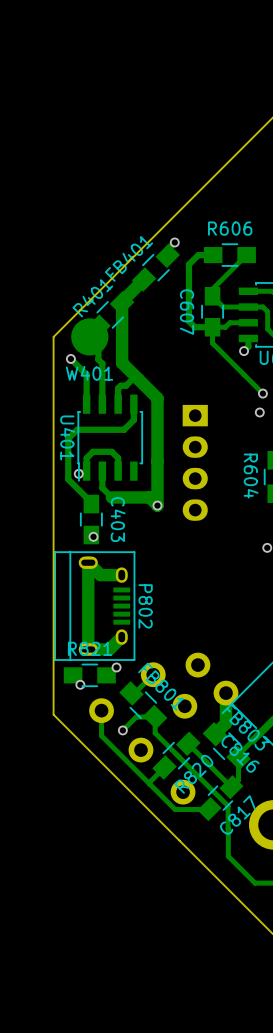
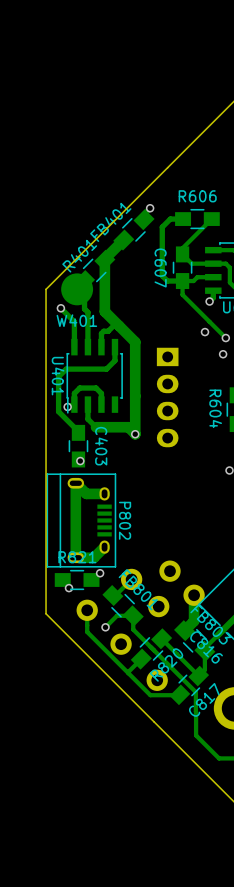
via: none -> (205, 332)

